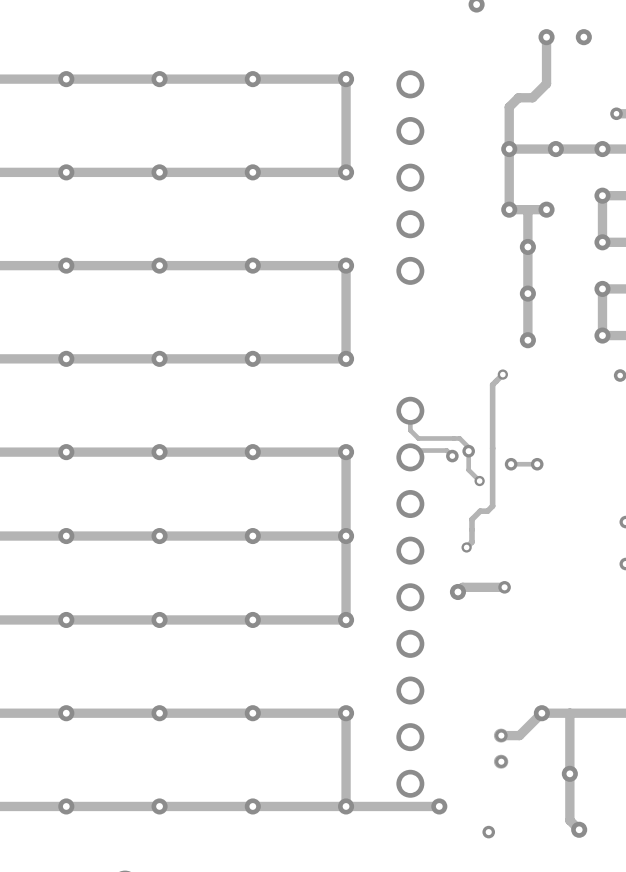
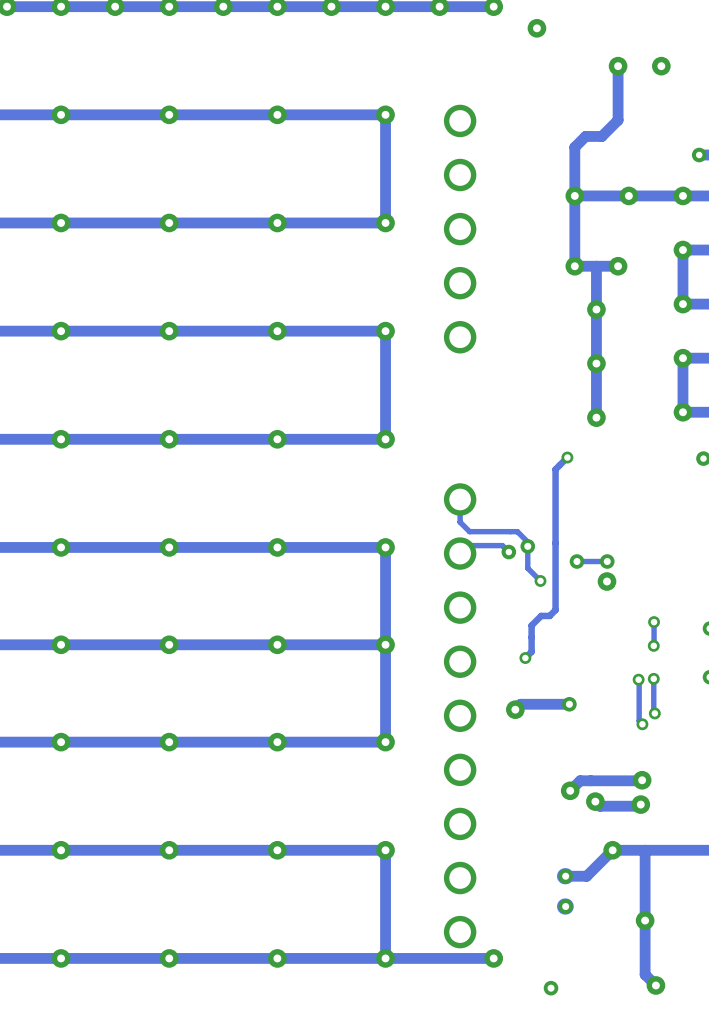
via: none -> (606, 581)
track: none -> (654, 622) (654, 645)
via: none -> (654, 622)
via: none -> (653, 645)
track: none -> (653, 678) (654, 713)
via: none -> (653, 678)
track: none -> (638, 679) (639, 721) (642, 724)
via: none -> (638, 679)
via: none -> (654, 713)
via: none -> (642, 724)
track: none -> (642, 780) (580, 780) (570, 790)
via: none -> (642, 780)
via: none -> (570, 790)
track: none -> (595, 801) (599, 806) (639, 806) (640, 804)
via: none -> (595, 801)
via: none -> (640, 804)

